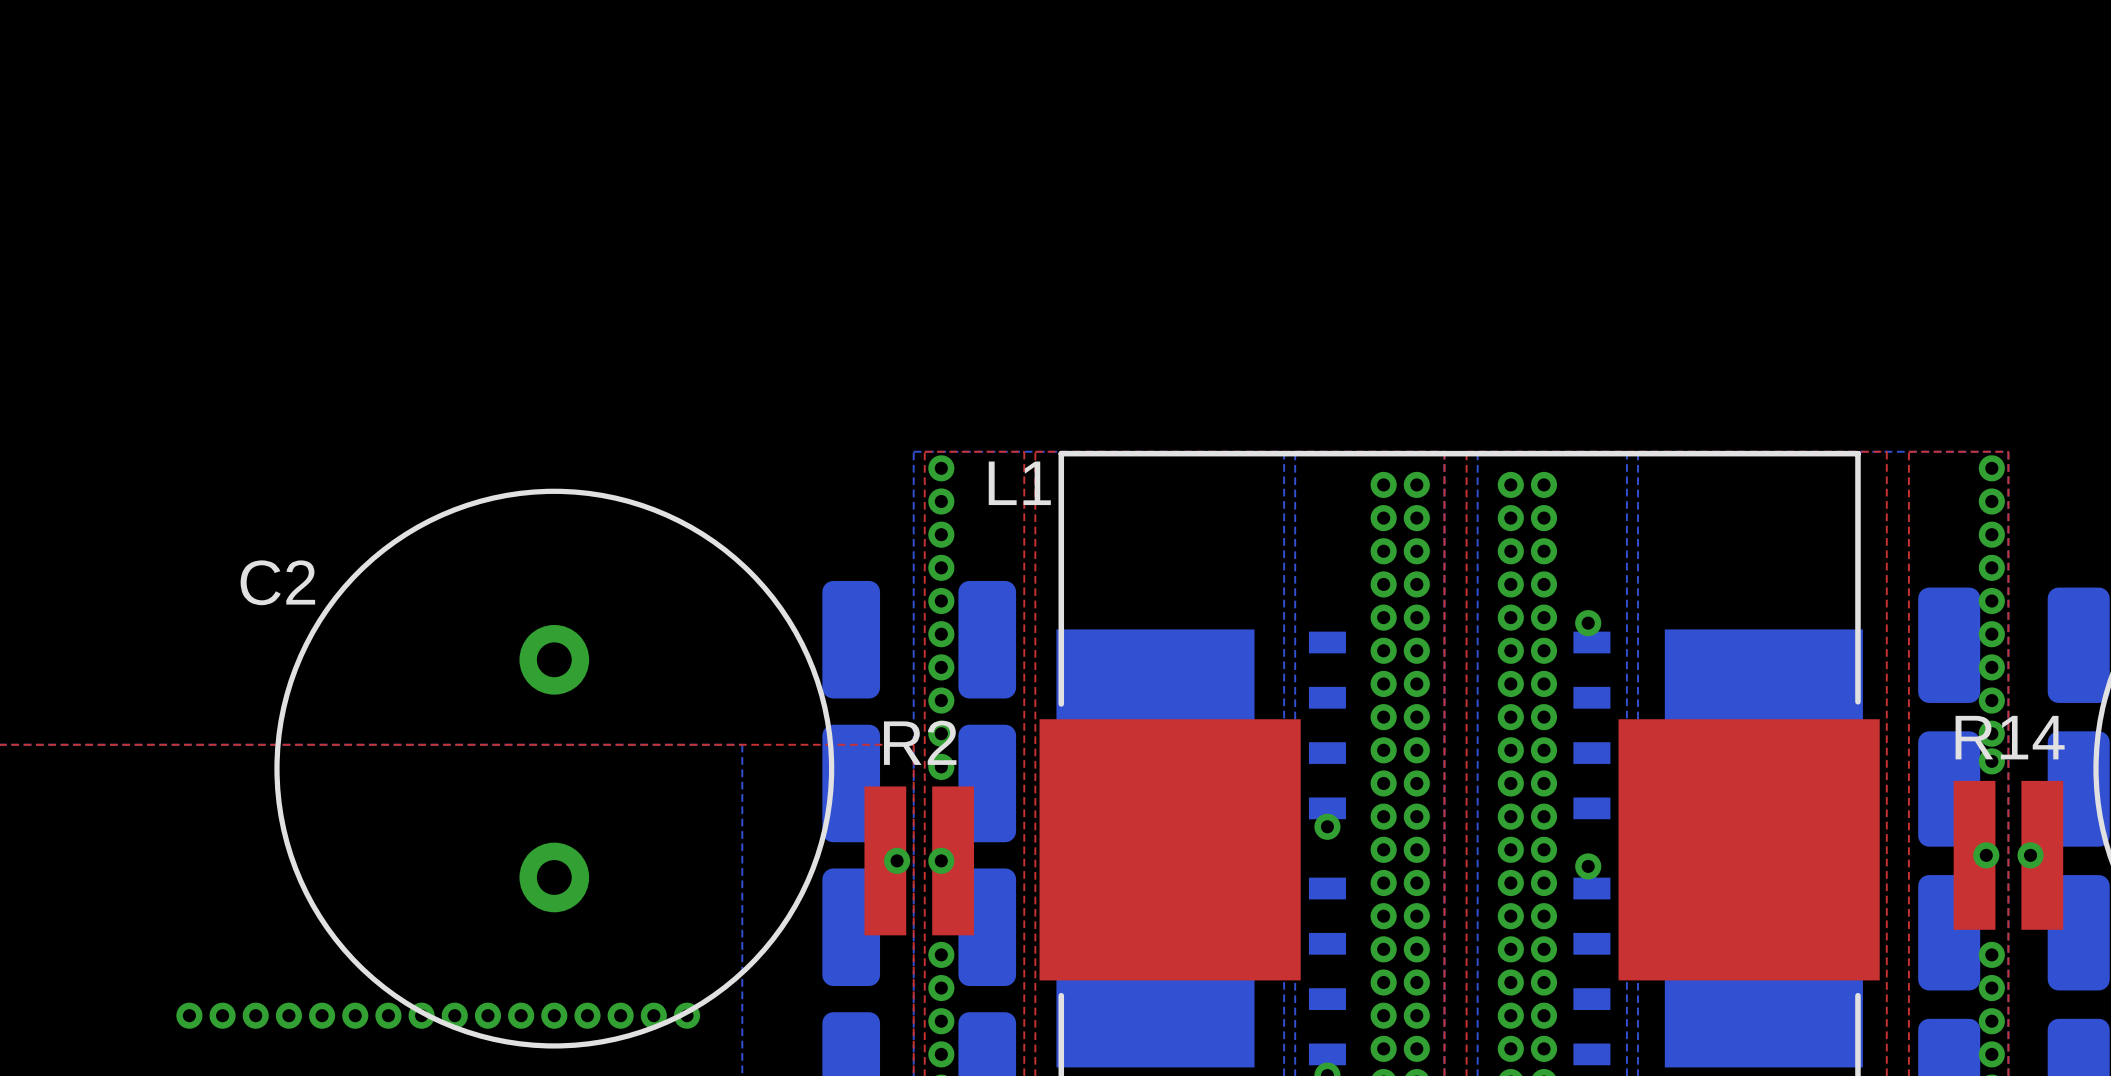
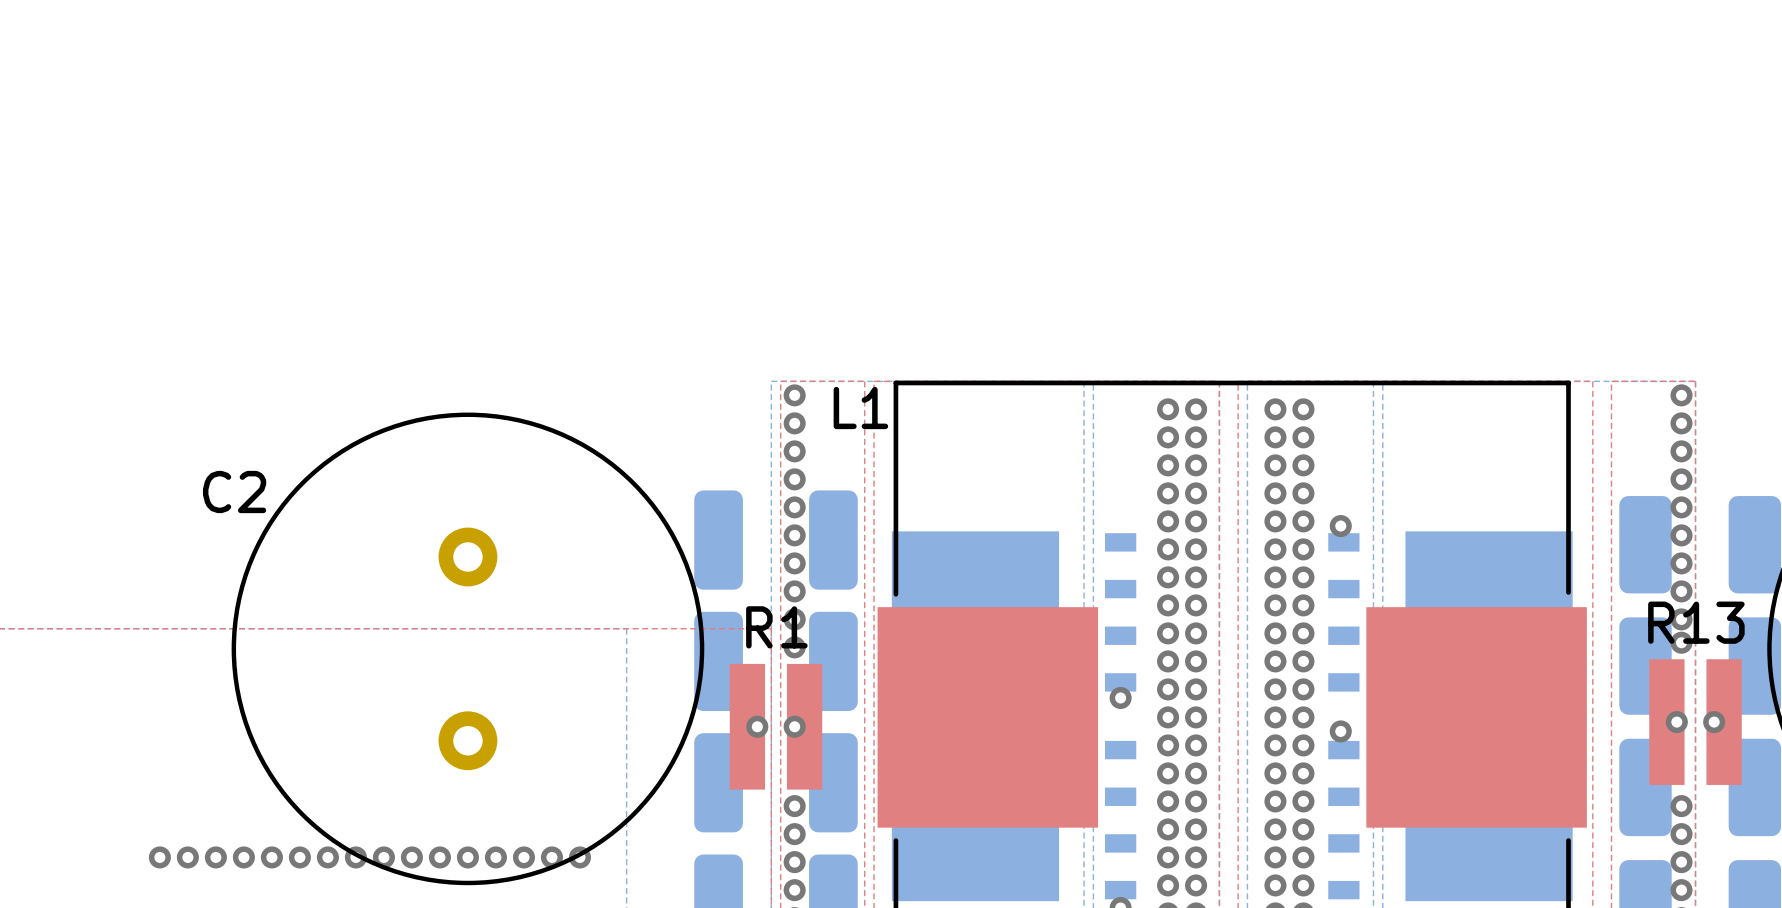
R14 name: R14 (2010, 737) -> R13 (1696, 622)
R2 name: R2 (920, 742) -> R1 (776, 627)

